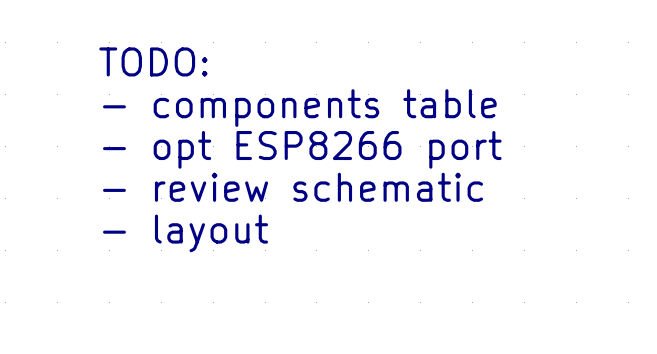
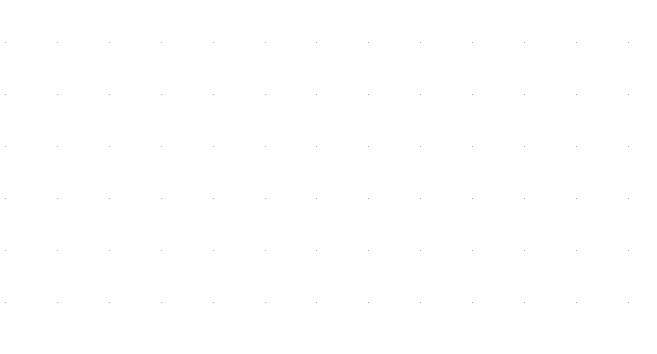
text: TODO: (153, 61) -> none
text: - components table (299, 108) -> none
text: - opt ESP8266 port (302, 149) -> none
text: - review schematic (293, 187) -> none
text: - layout (185, 233) -> none

